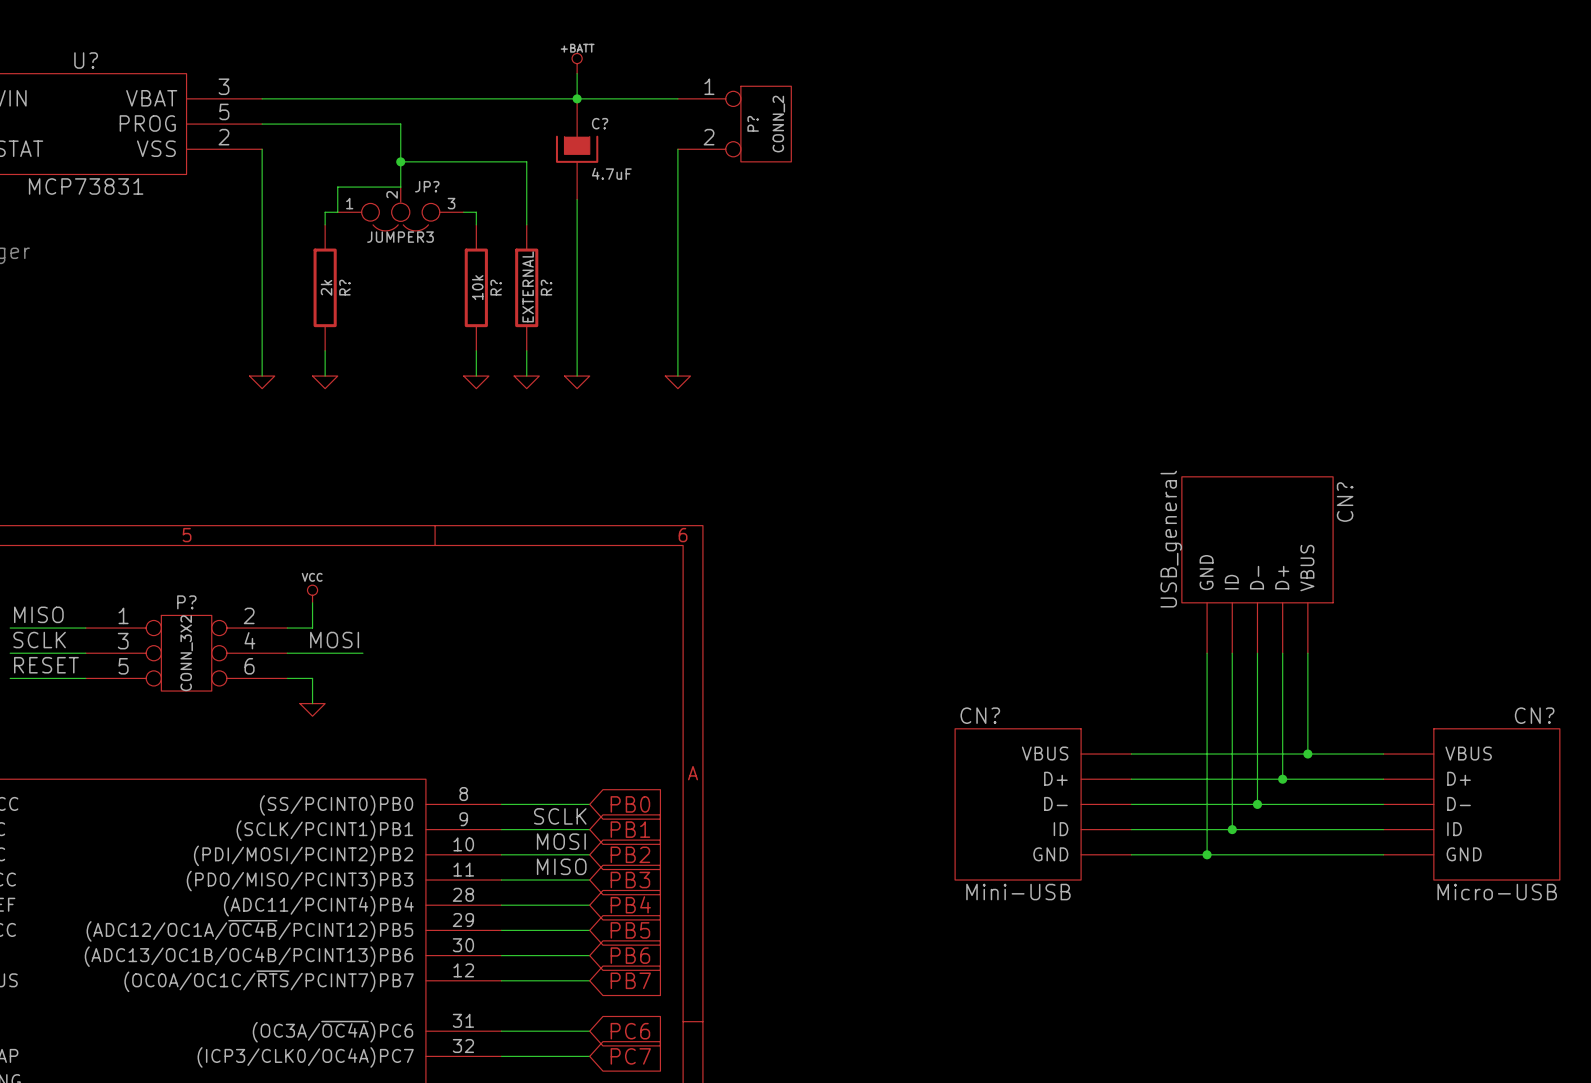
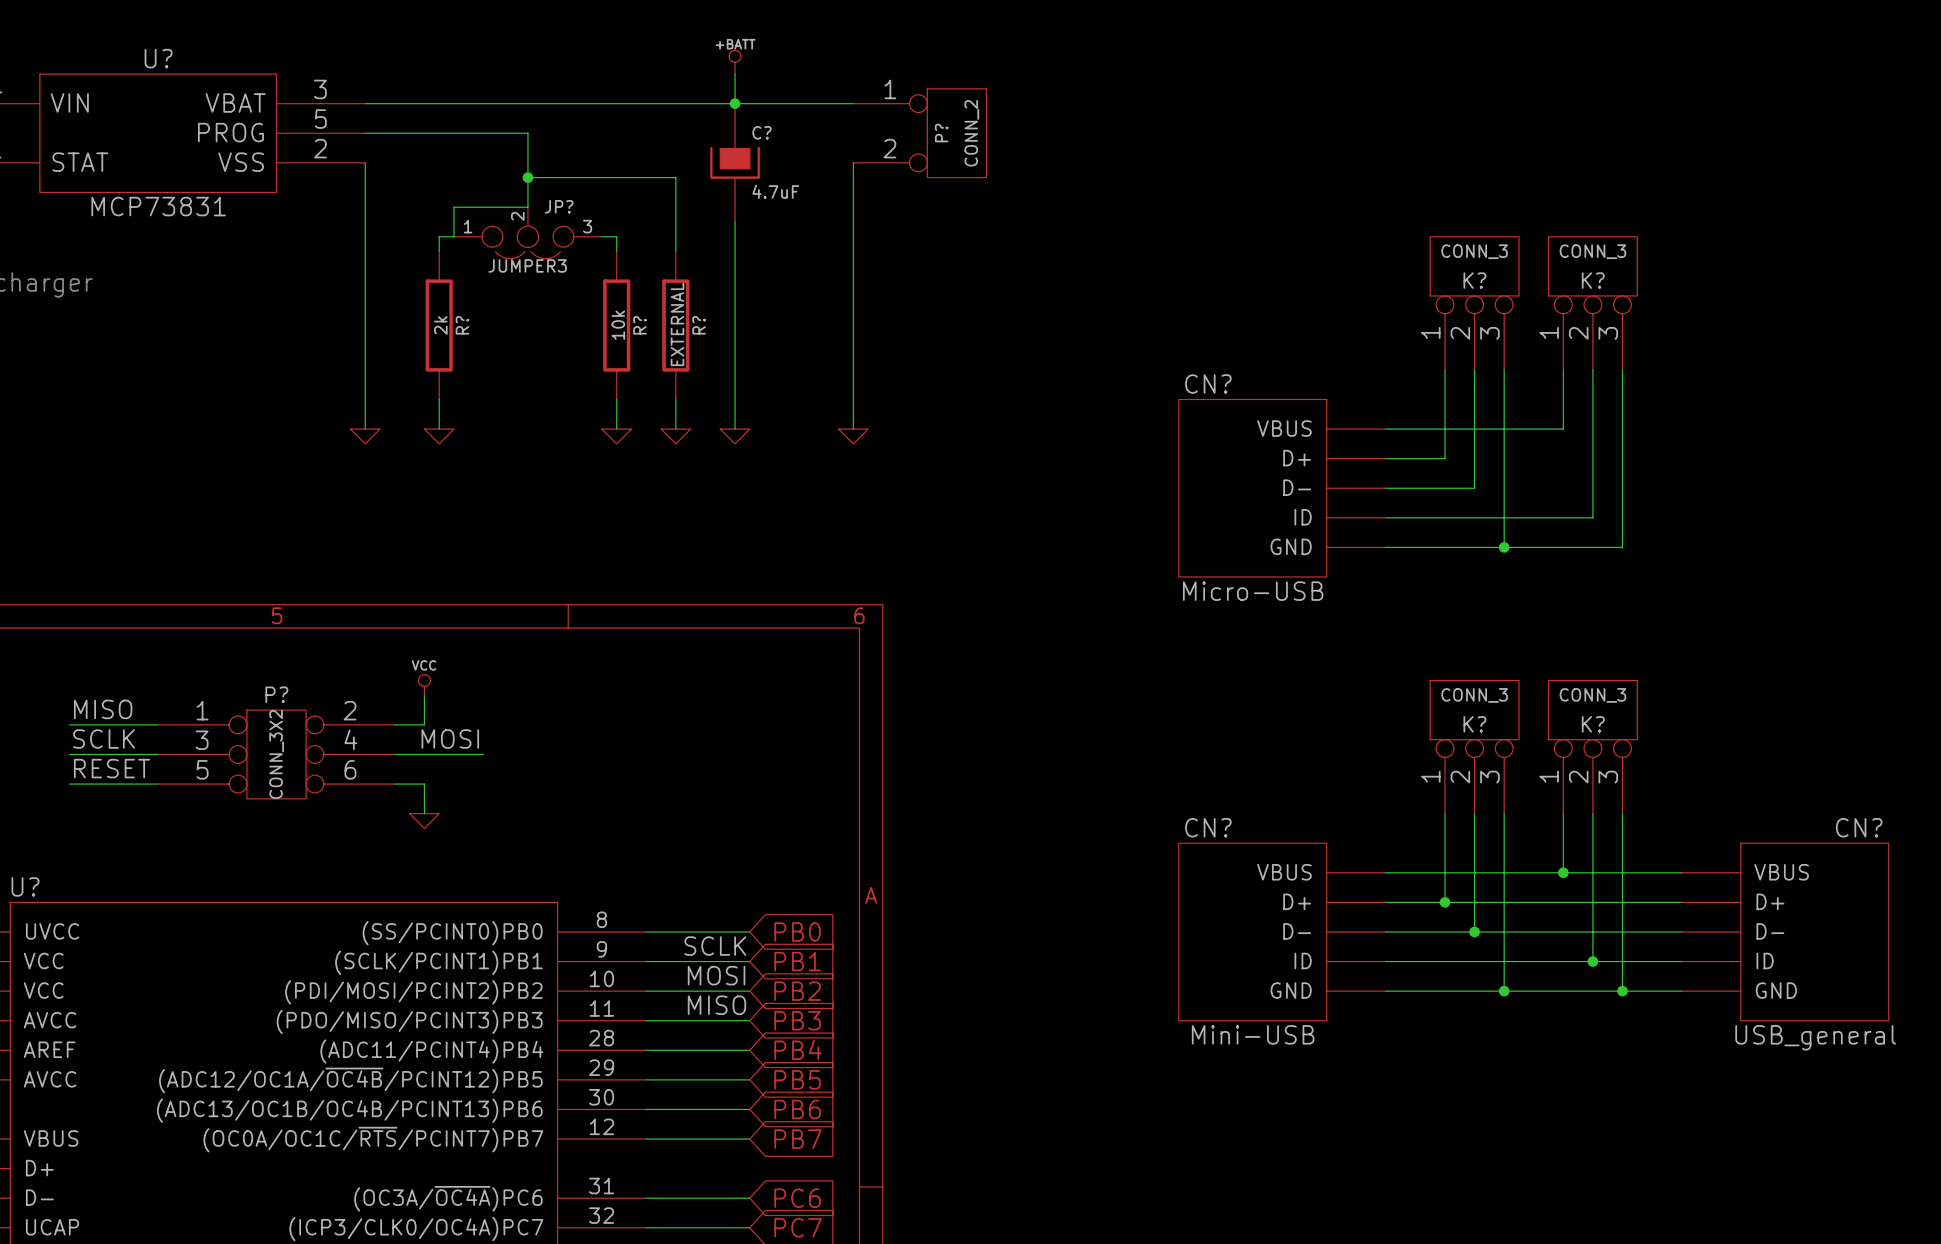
K?: none -> CONN_3 (1474, 303)
K?: none -> CONN_3 (1592, 303)
wire: none -> (1445, 369) (1445, 458) (1385, 458)
wire: none -> (1474, 369) (1474, 488) (1385, 488)
wire: none -> (1504, 369) (1504, 547)
wire: none -> (1563, 369) (1563, 429) (1385, 429)
wire: none -> (1592, 369) (1592, 517) (1385, 517)
wire: none -> (1622, 369) (1622, 547) (1385, 547)
CN?: none -> Micro-USB (1282, 488)
junction: none -> (1504, 547)
CN?: USB_general (1257, 565) -> none
K?: none -> CONN_3 (1474, 747)
K?: none -> CONN_3 (1592, 747)
wire: (1257, 653) (1257, 804) -> (1622, 813) (1622, 991)
wire: none -> (1445, 813) (1445, 902)
wire: (1282, 754) (1282, 779) -> (1504, 961) (1504, 991)
junction: none -> (1563, 872)
wire: none -> (1592, 872) (1592, 961)
junction: (1307, 754) -> none
junction: none -> (1445, 902)
junction: (1282, 779) -> none
wire: (1207, 804) (1207, 854) -> none
junction: none -> (1474, 931)
junction: (1257, 804) -> none
junction: (1232, 829) -> none
junction: none -> (1592, 961)
junction: (1207, 854) -> none
junction: none -> (1504, 991)
junction: none -> (1622, 991)
CN? value: Micro-USB (1497, 892) -> USB_general (1815, 1037)

